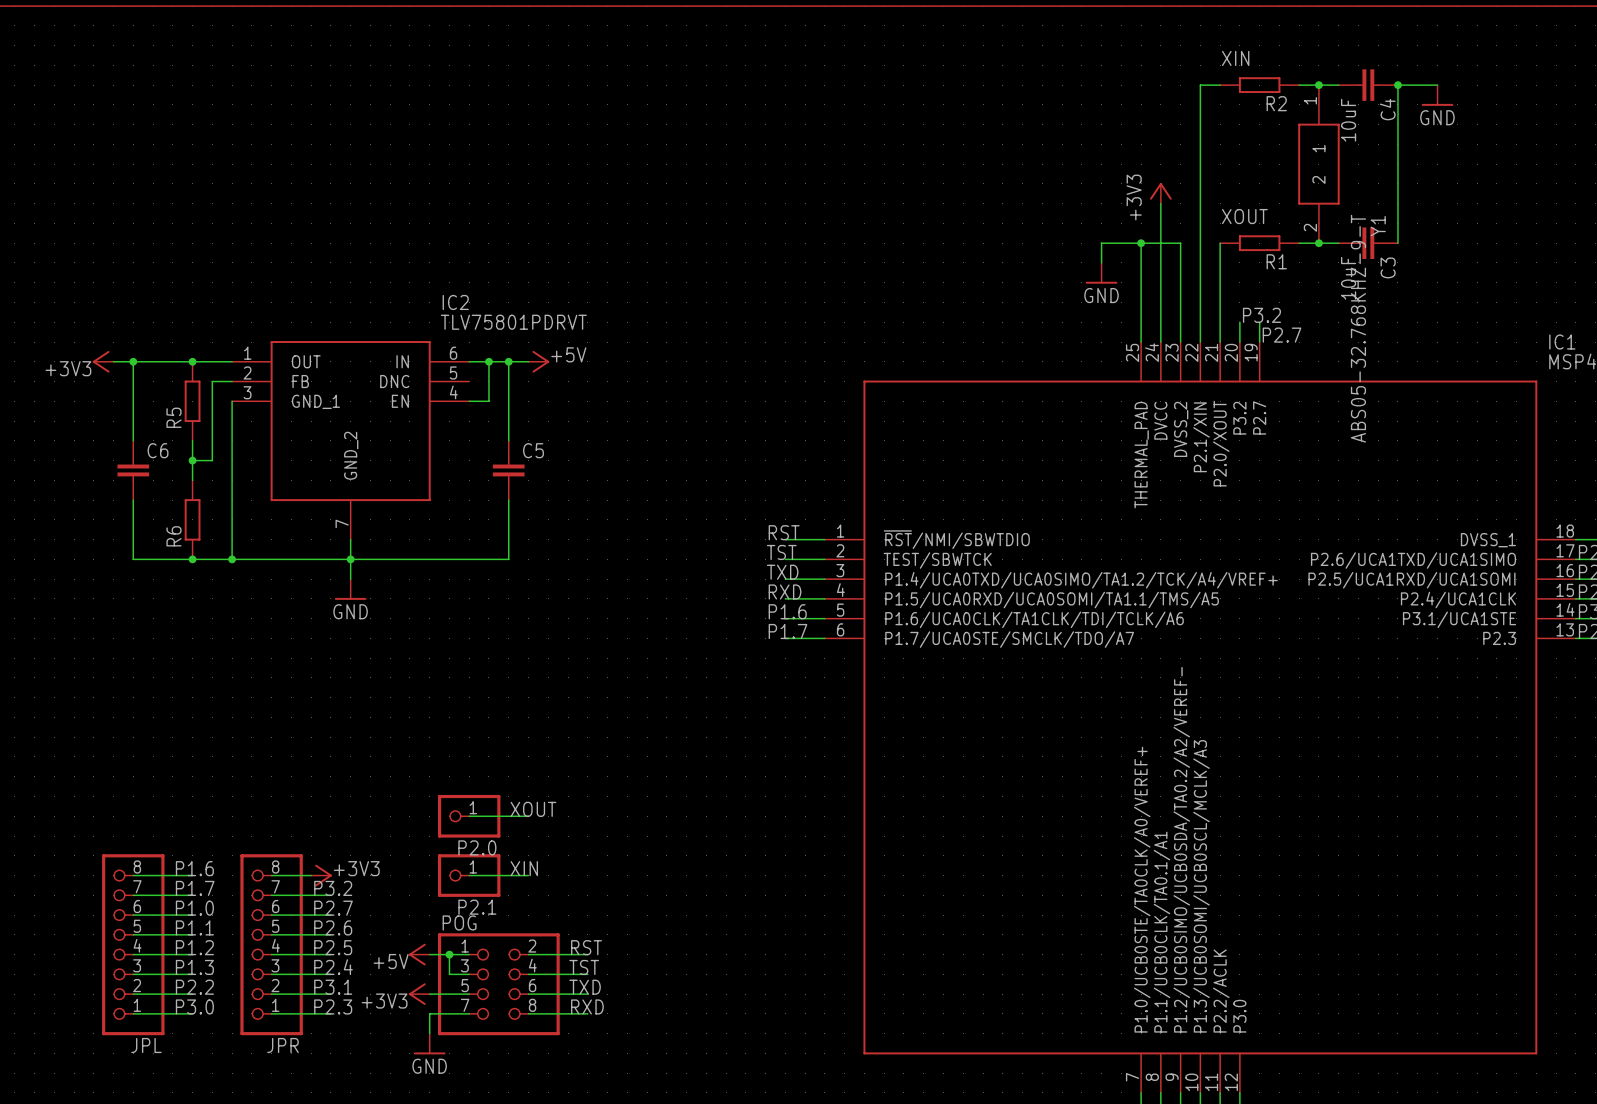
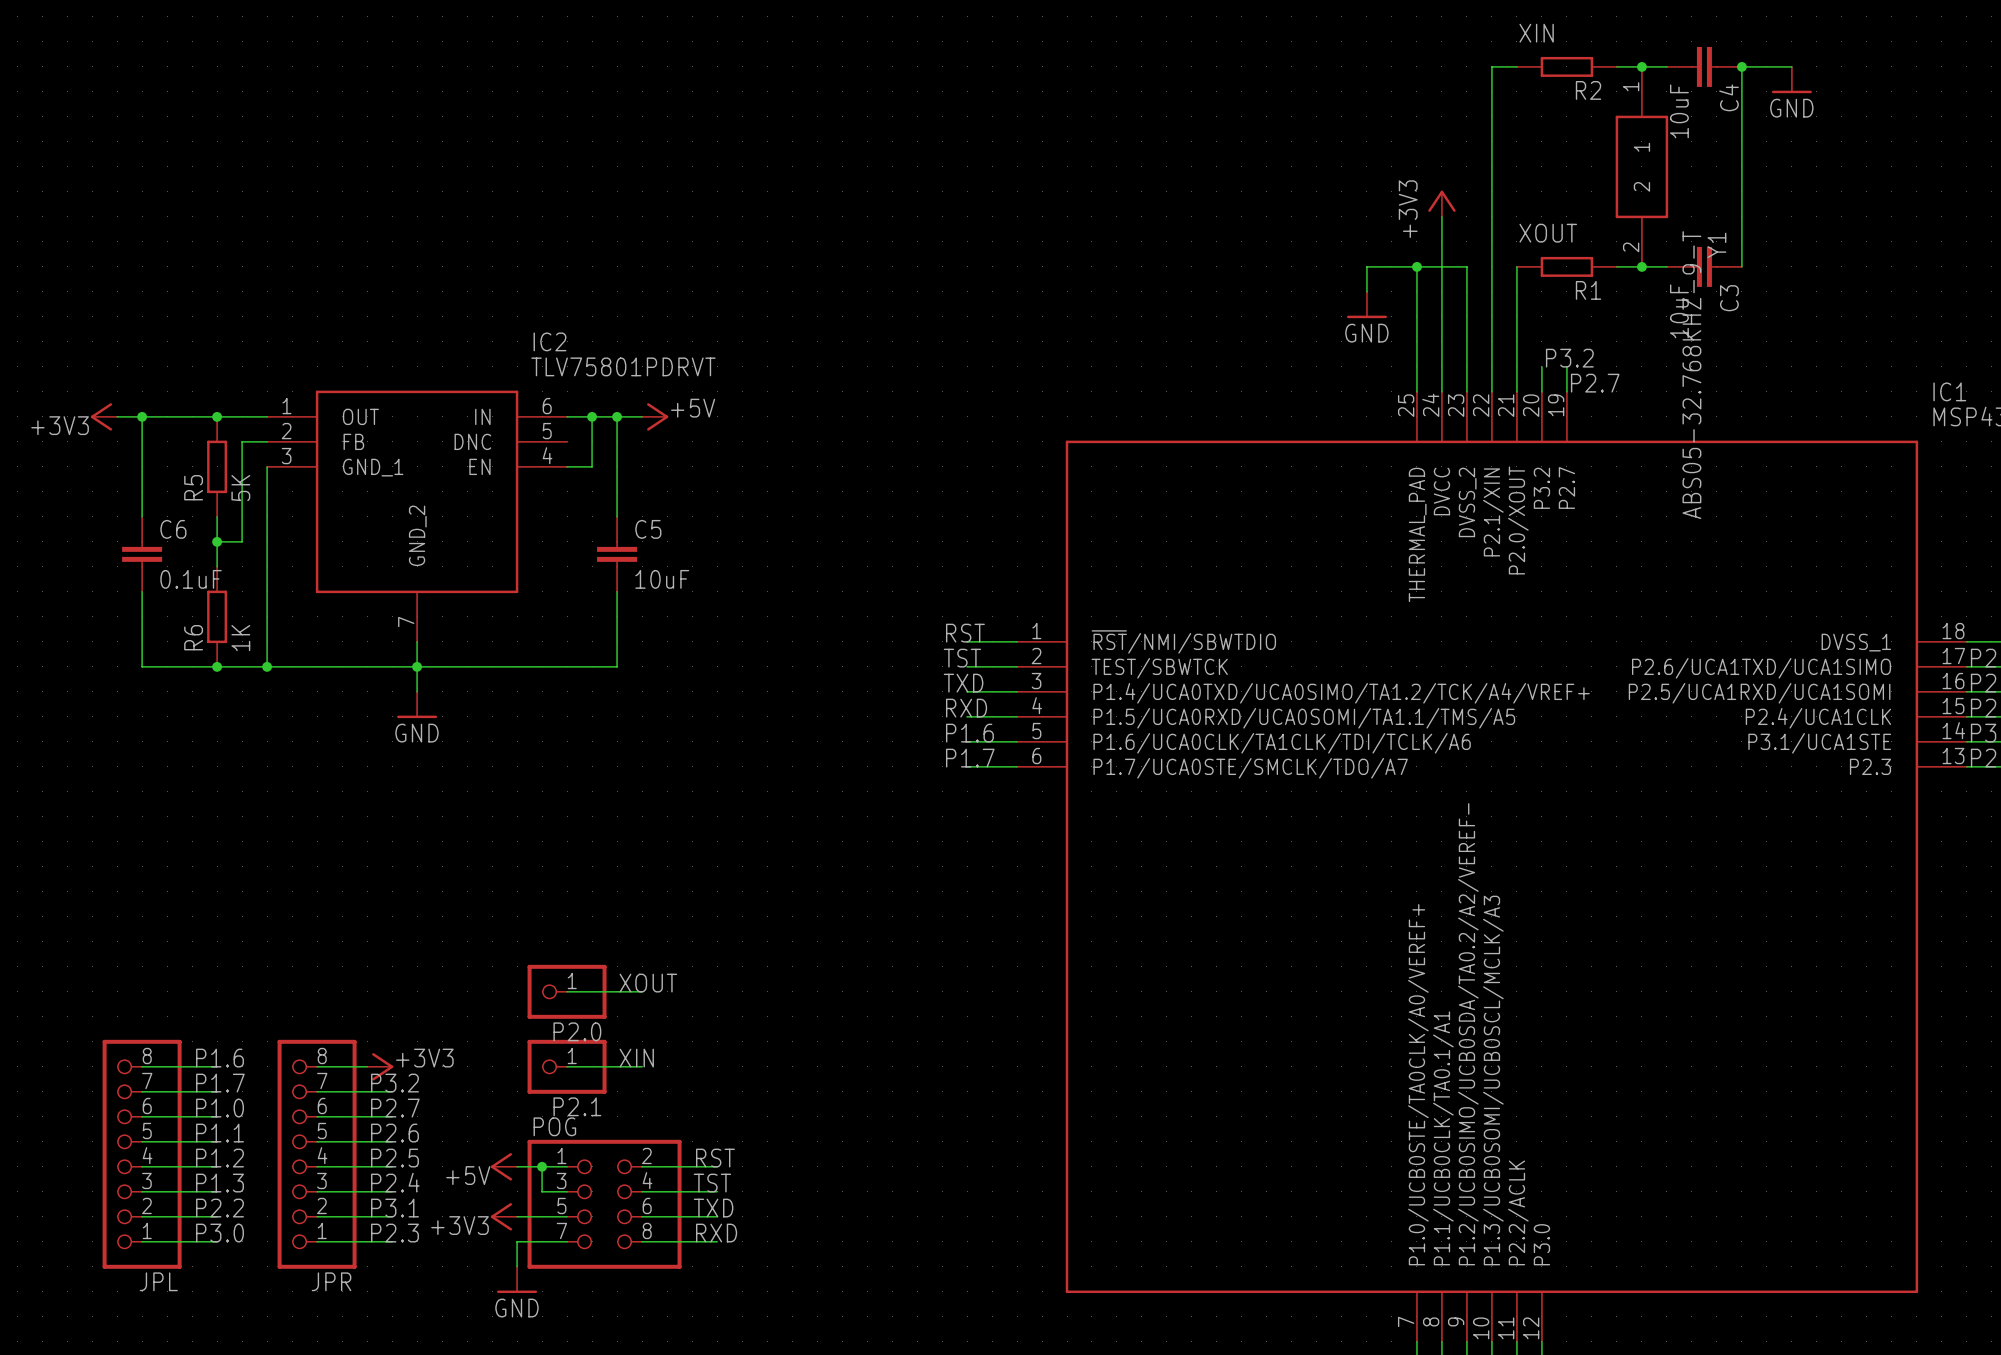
R5 value: none -> 5K (240, 488)
C6 value: none -> 0.1uF (191, 579)
C5 value: none -> 10uF (662, 579)
R6 value: none -> 1K (240, 638)

